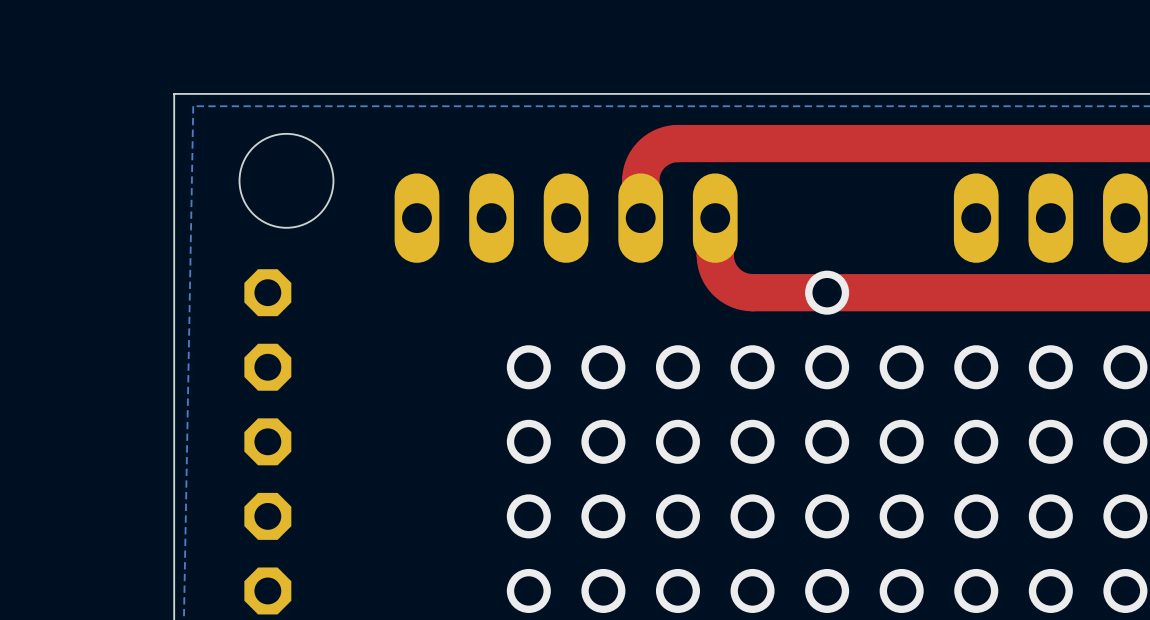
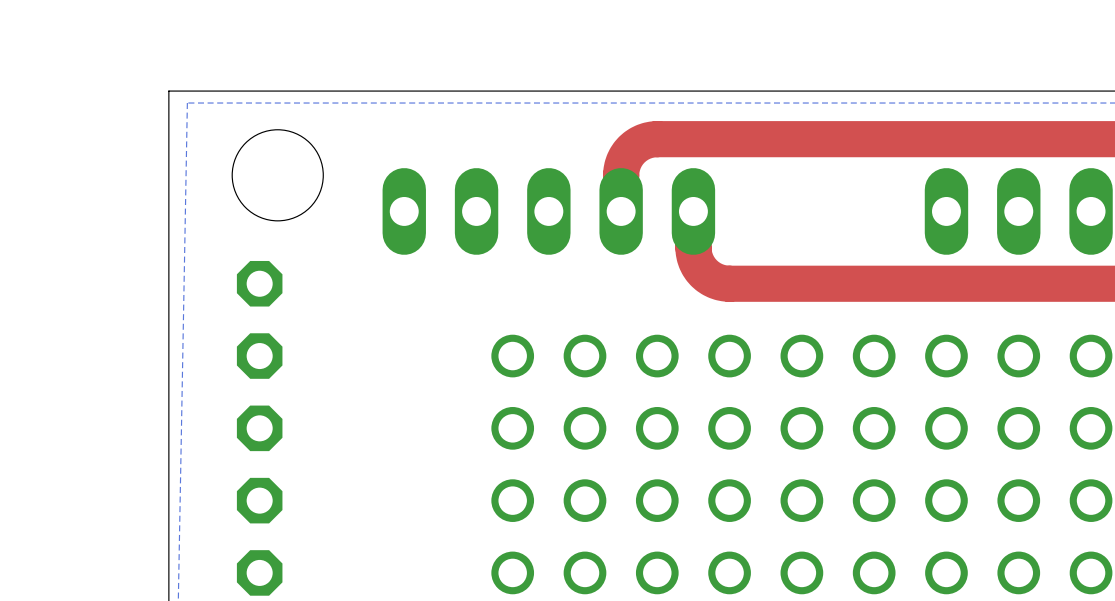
via: (827, 292) -> none

